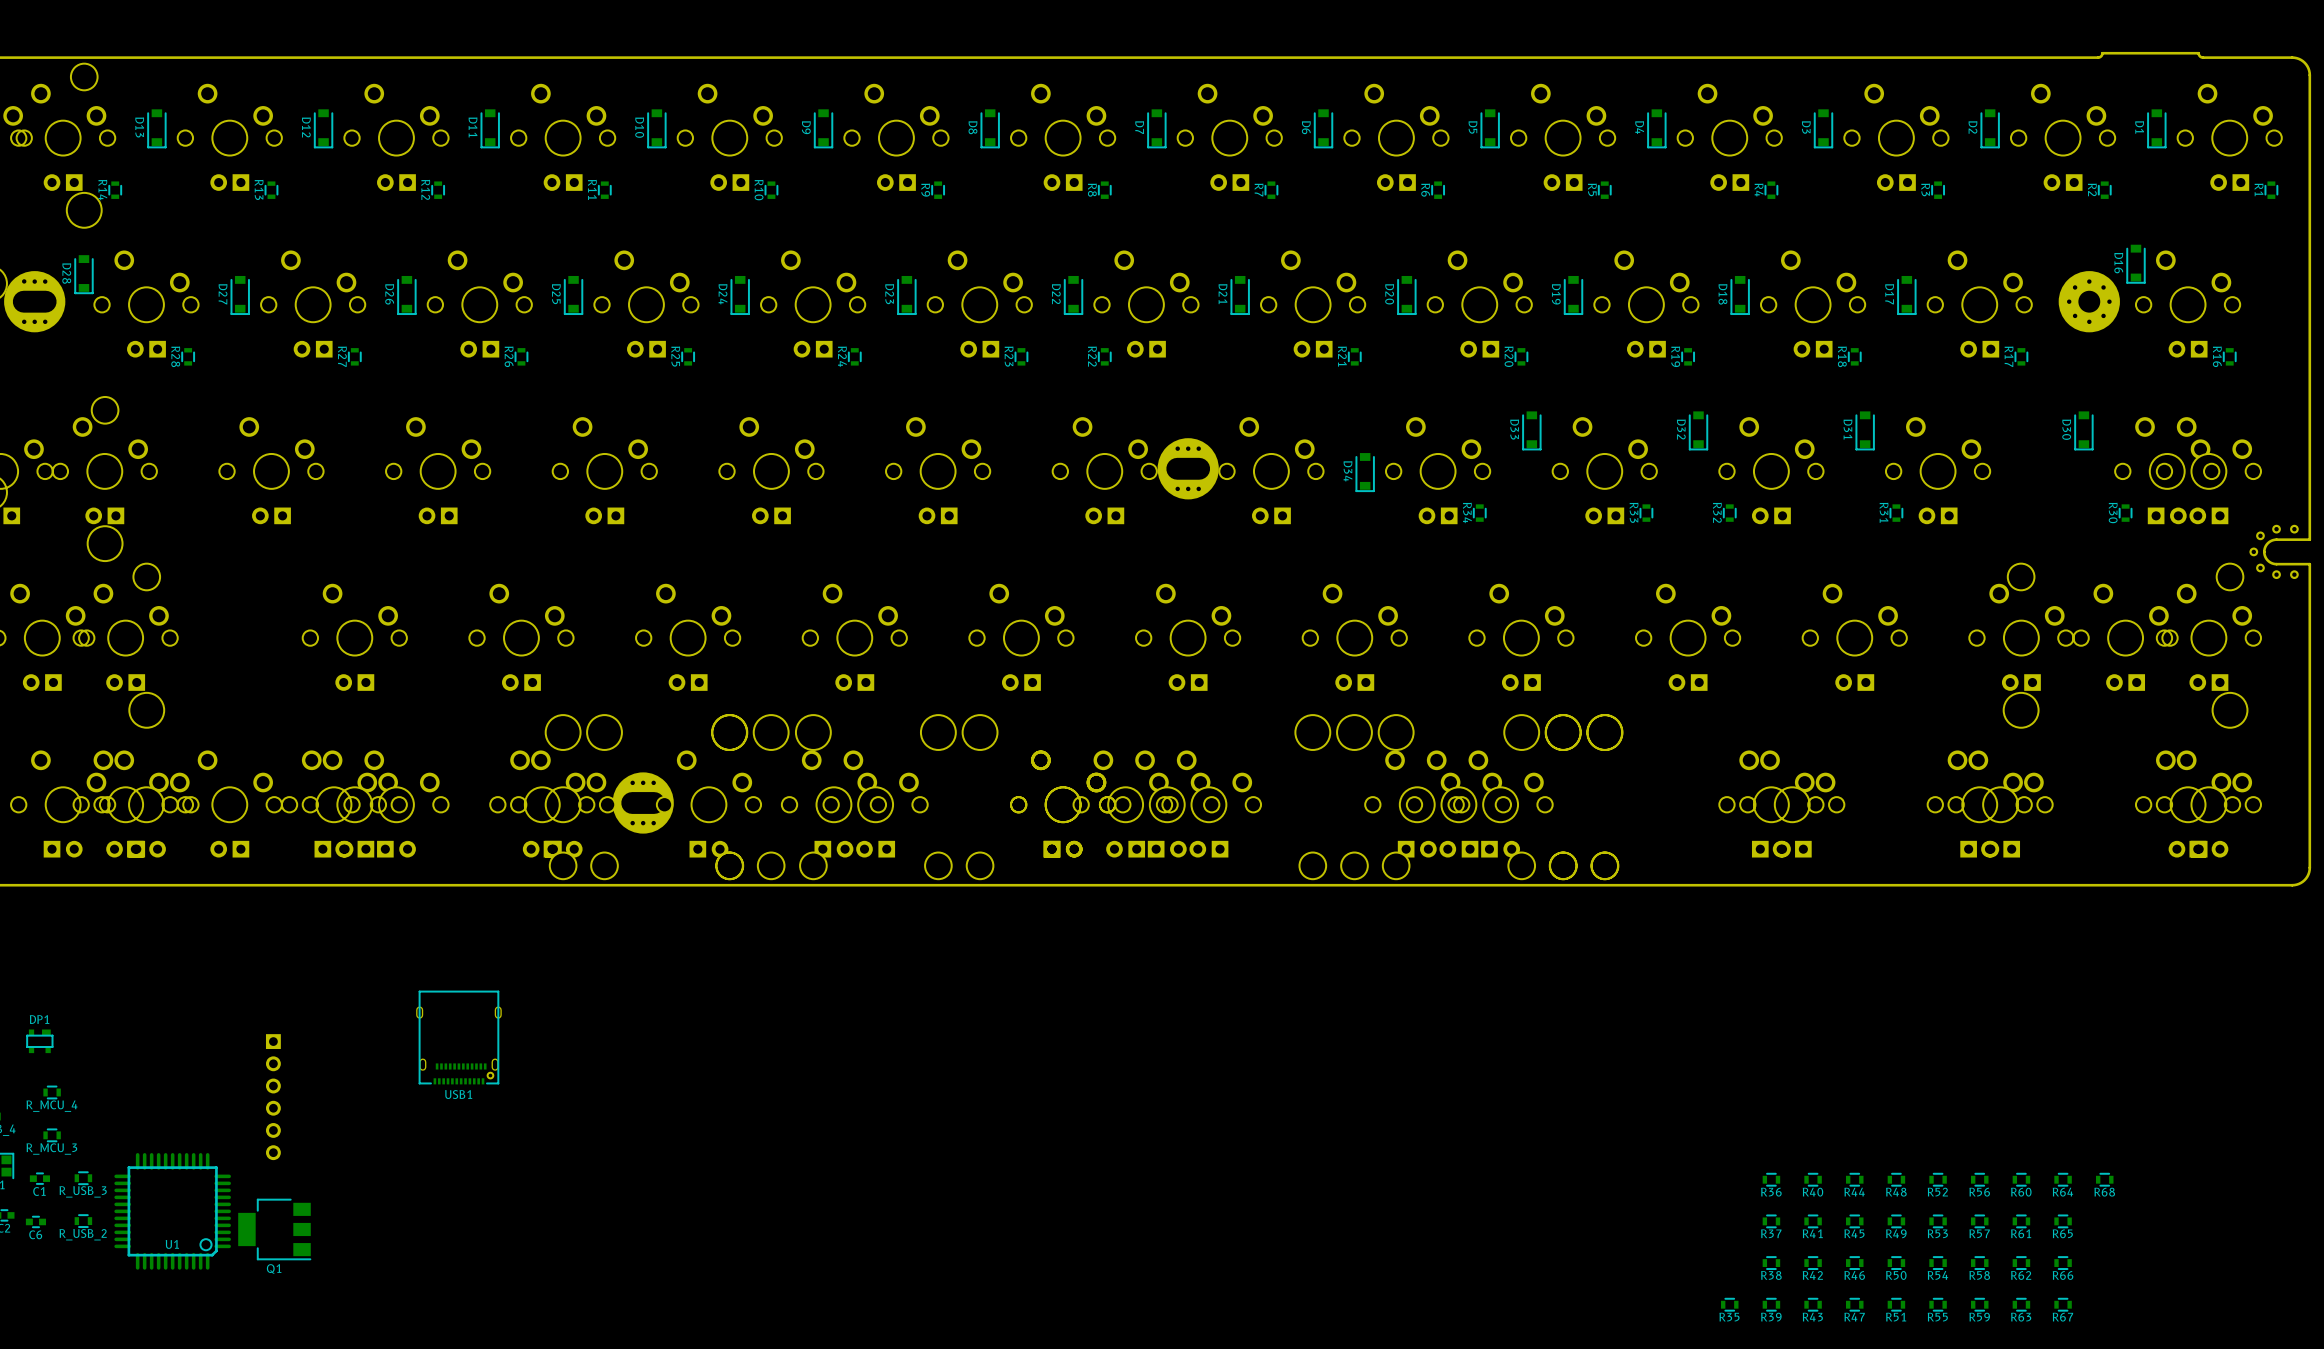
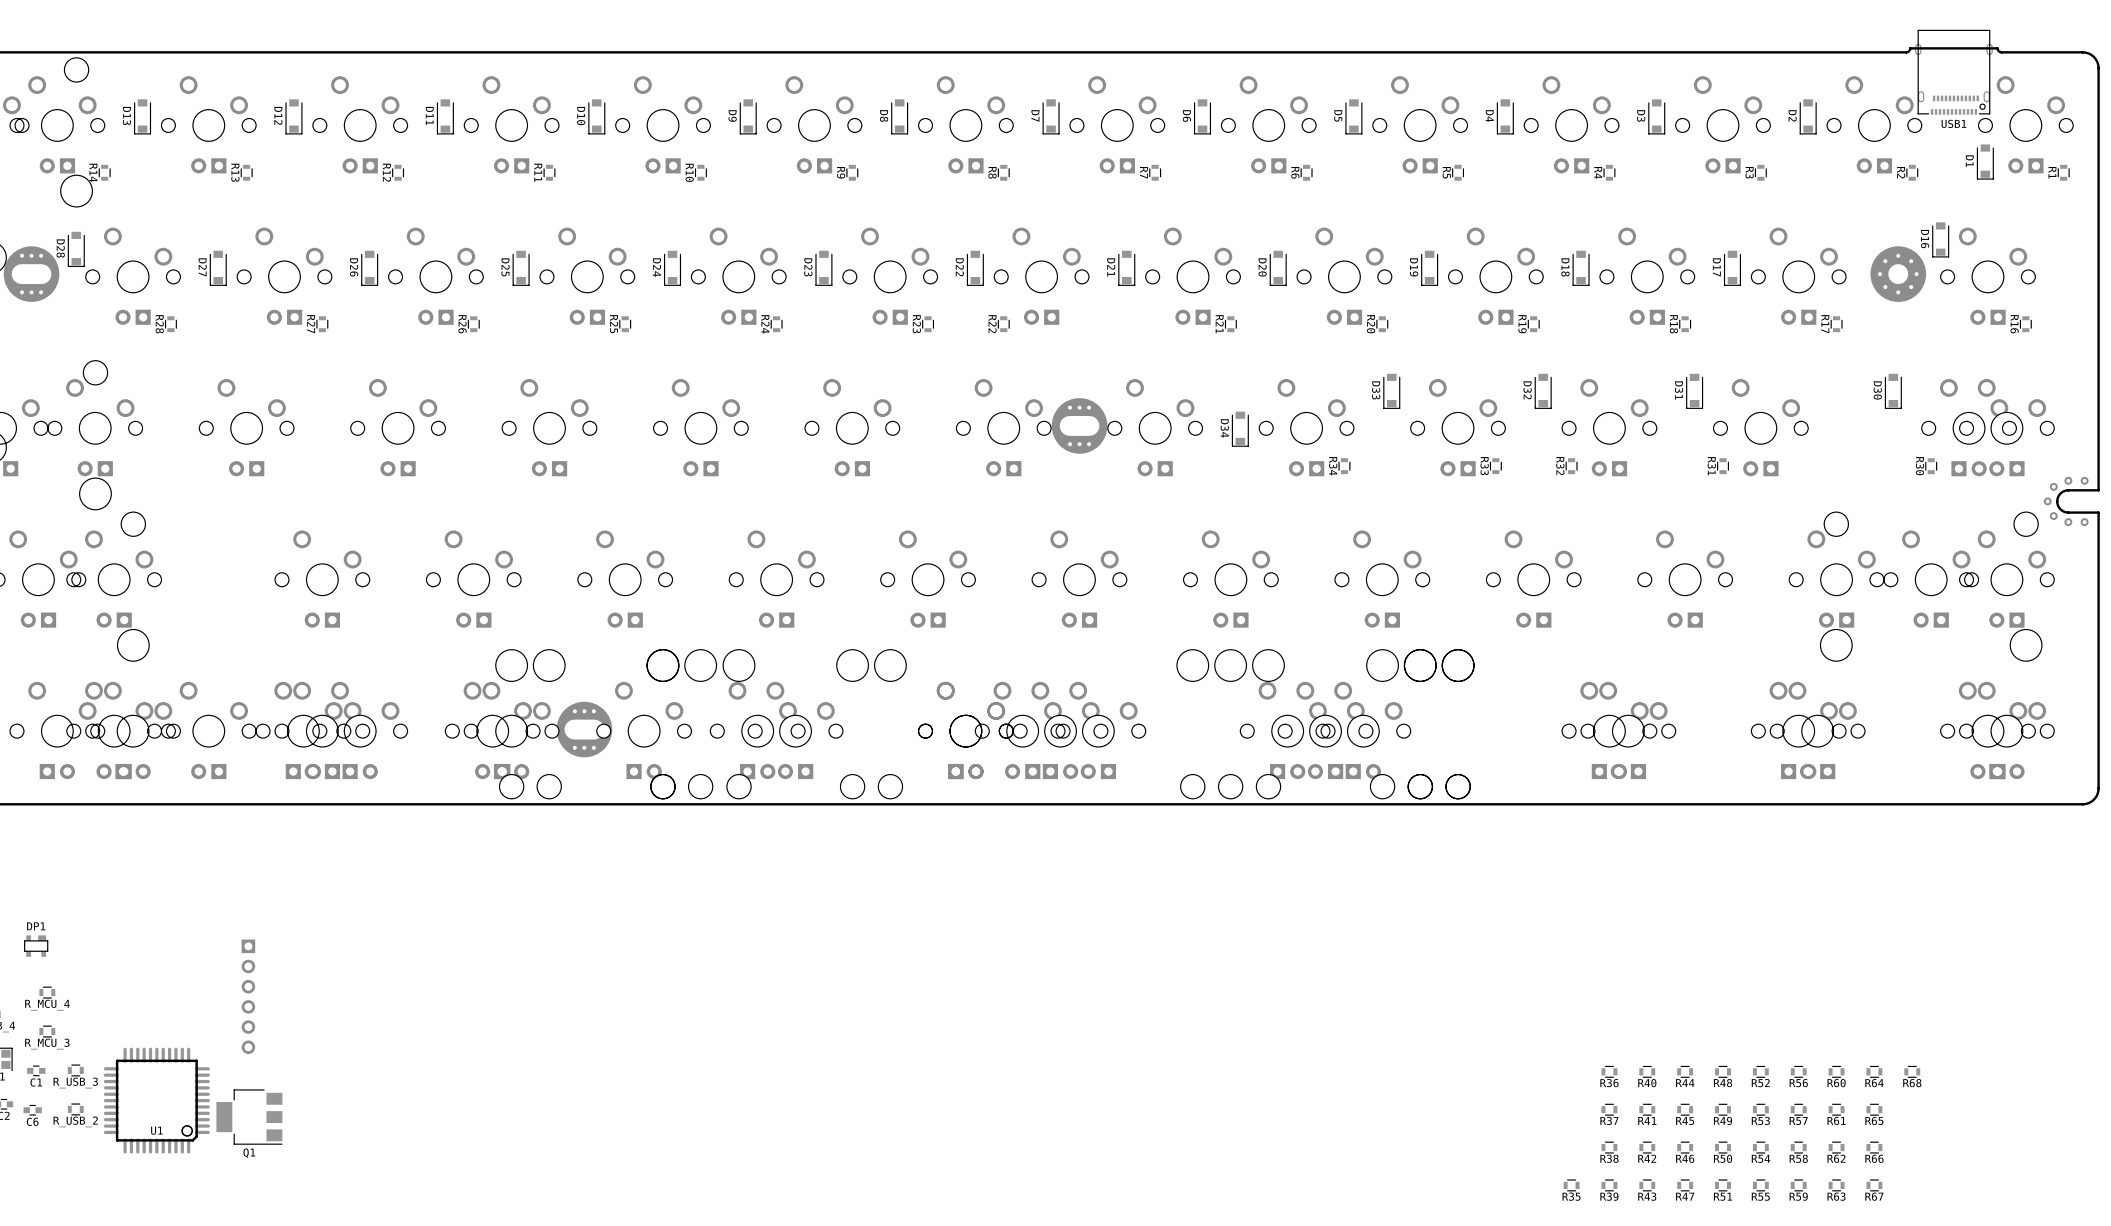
D1 position: (2156, 128) -> (1985, 161)
USB1 position: (458, 1037) -> (1953, 72)

